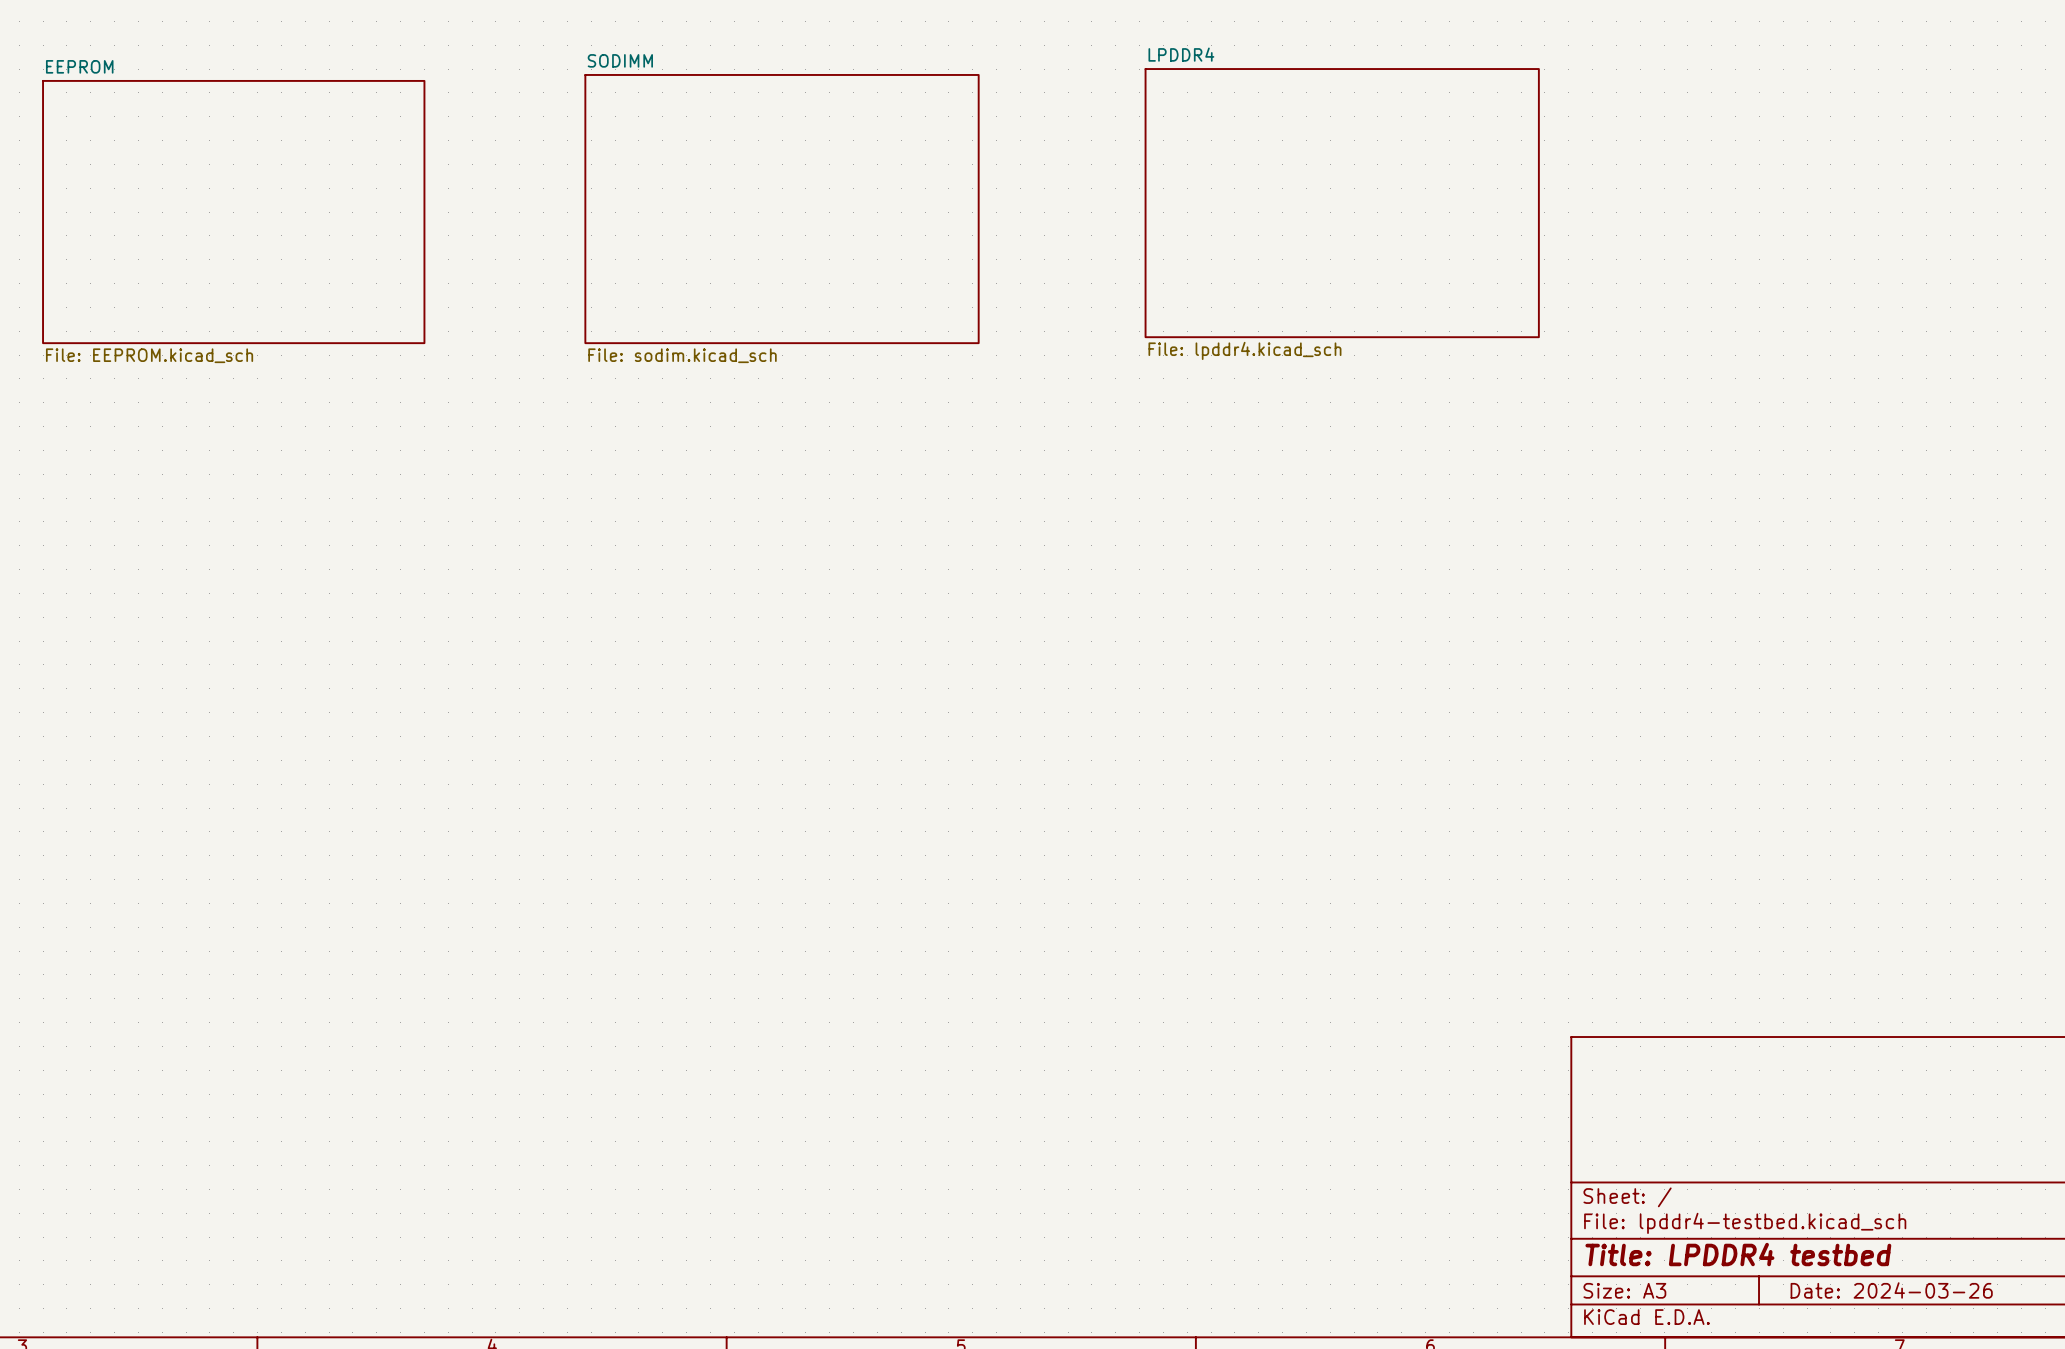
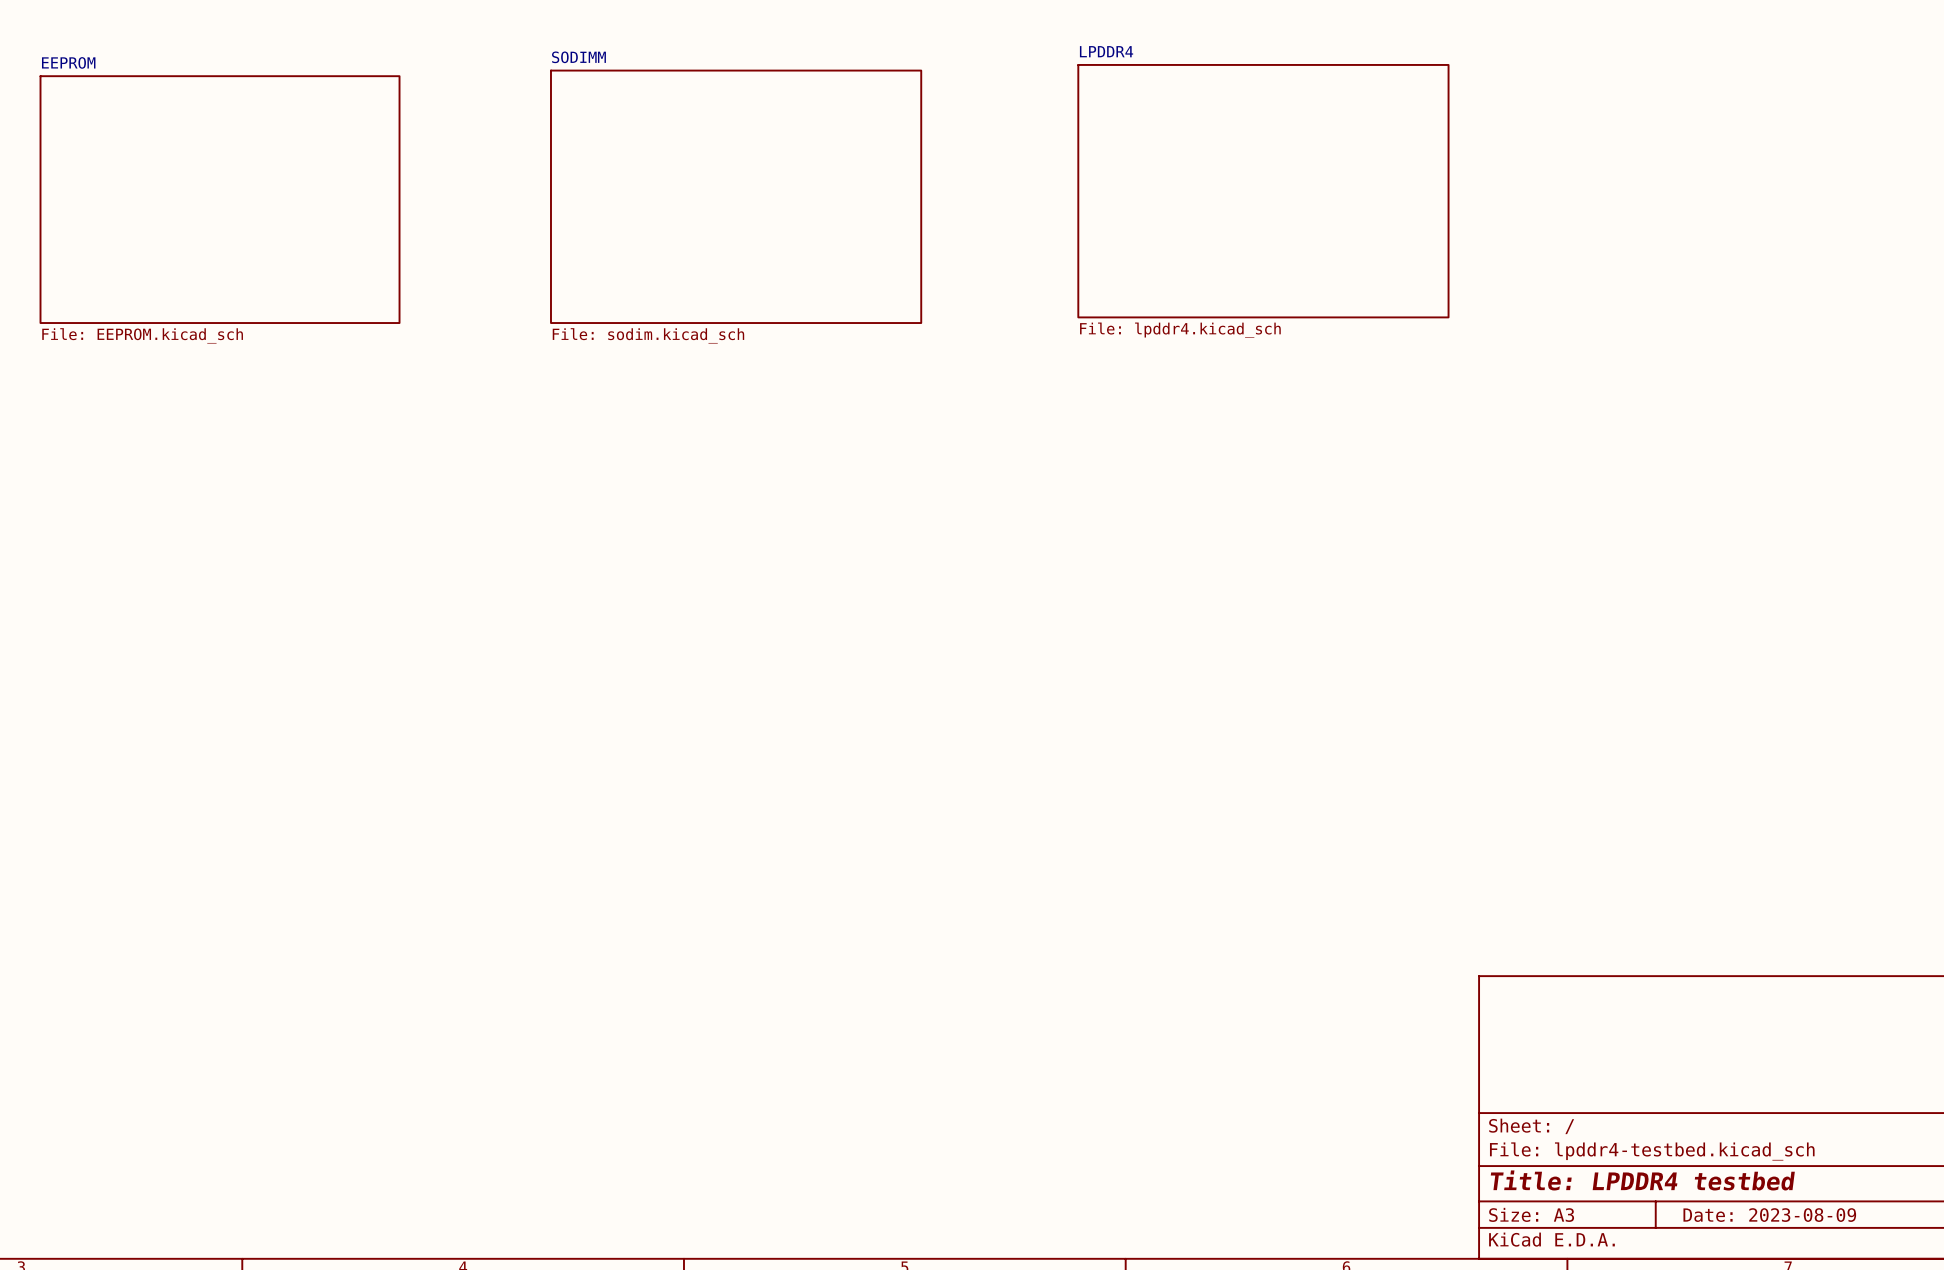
title block: Date: 2024-03-26 (1891, 1290) -> Date: 2023-08-09 (1769, 1215)

